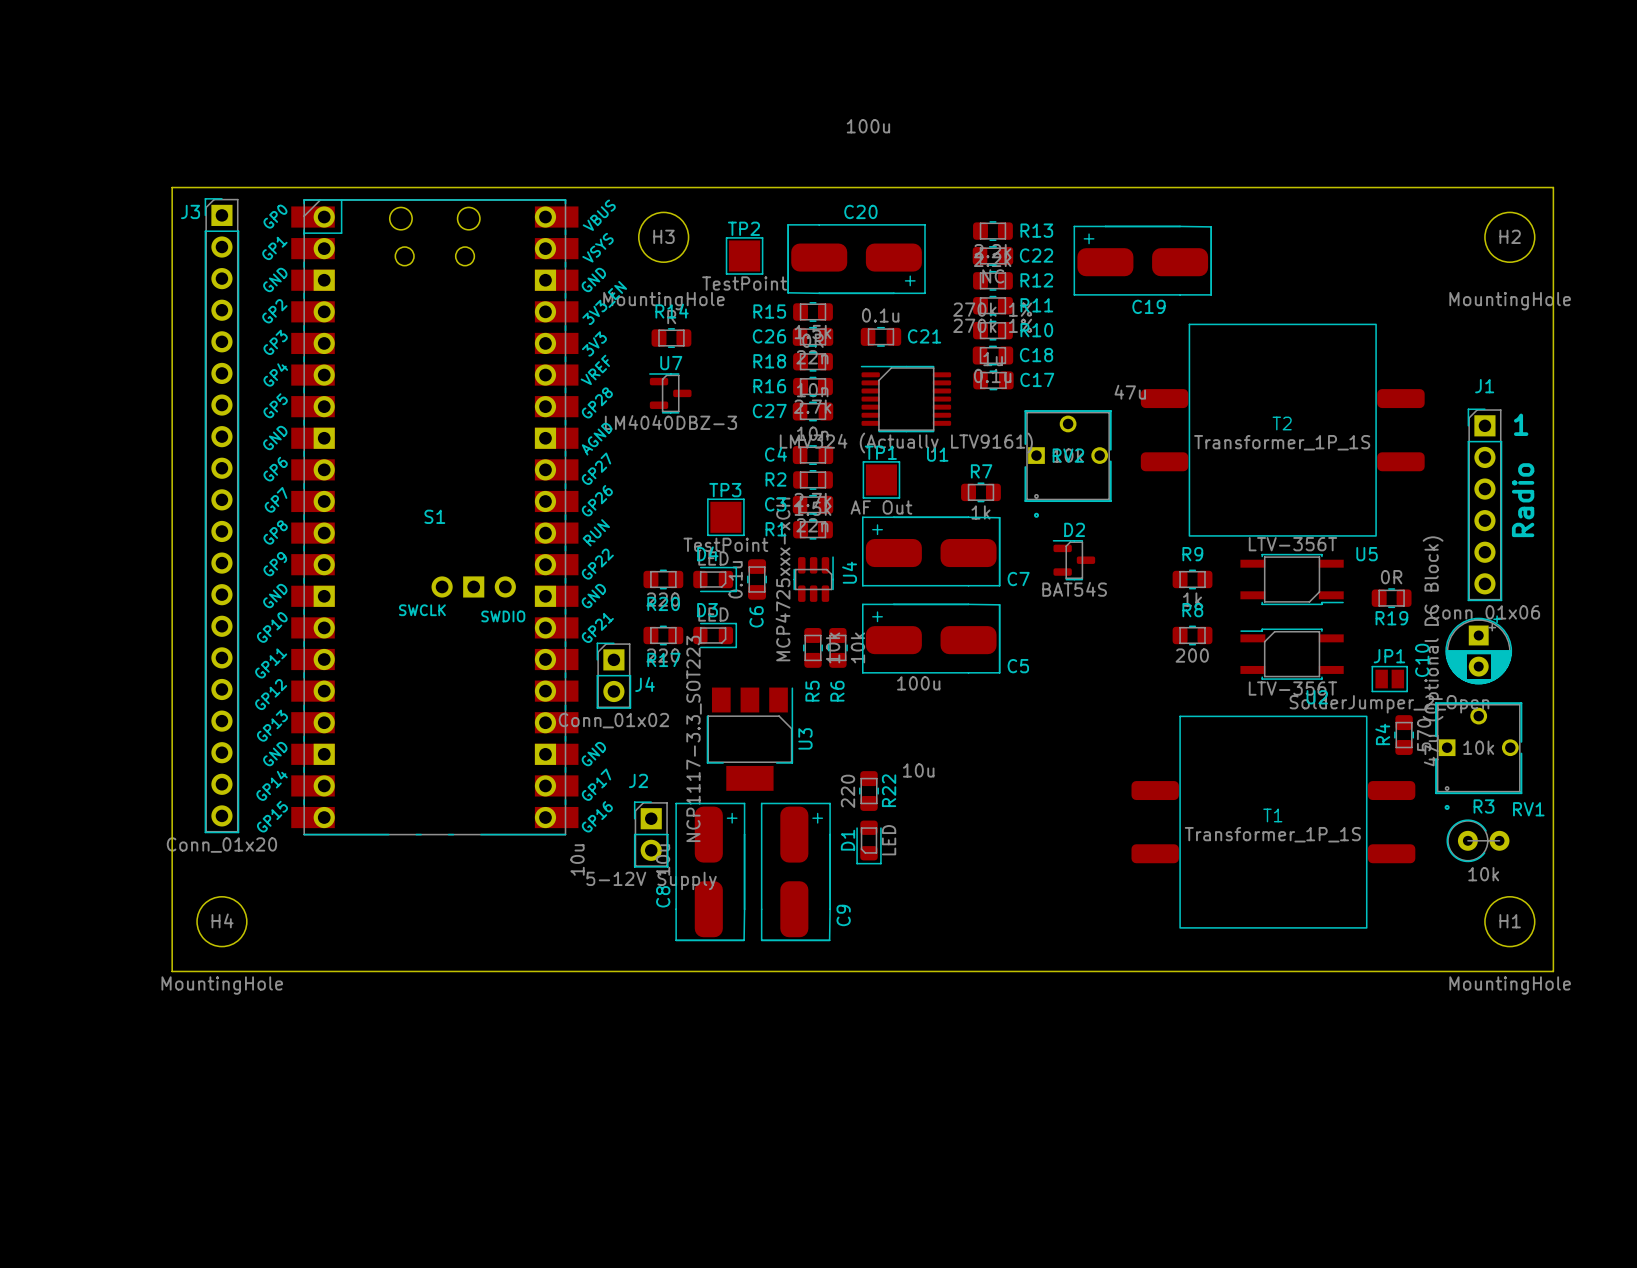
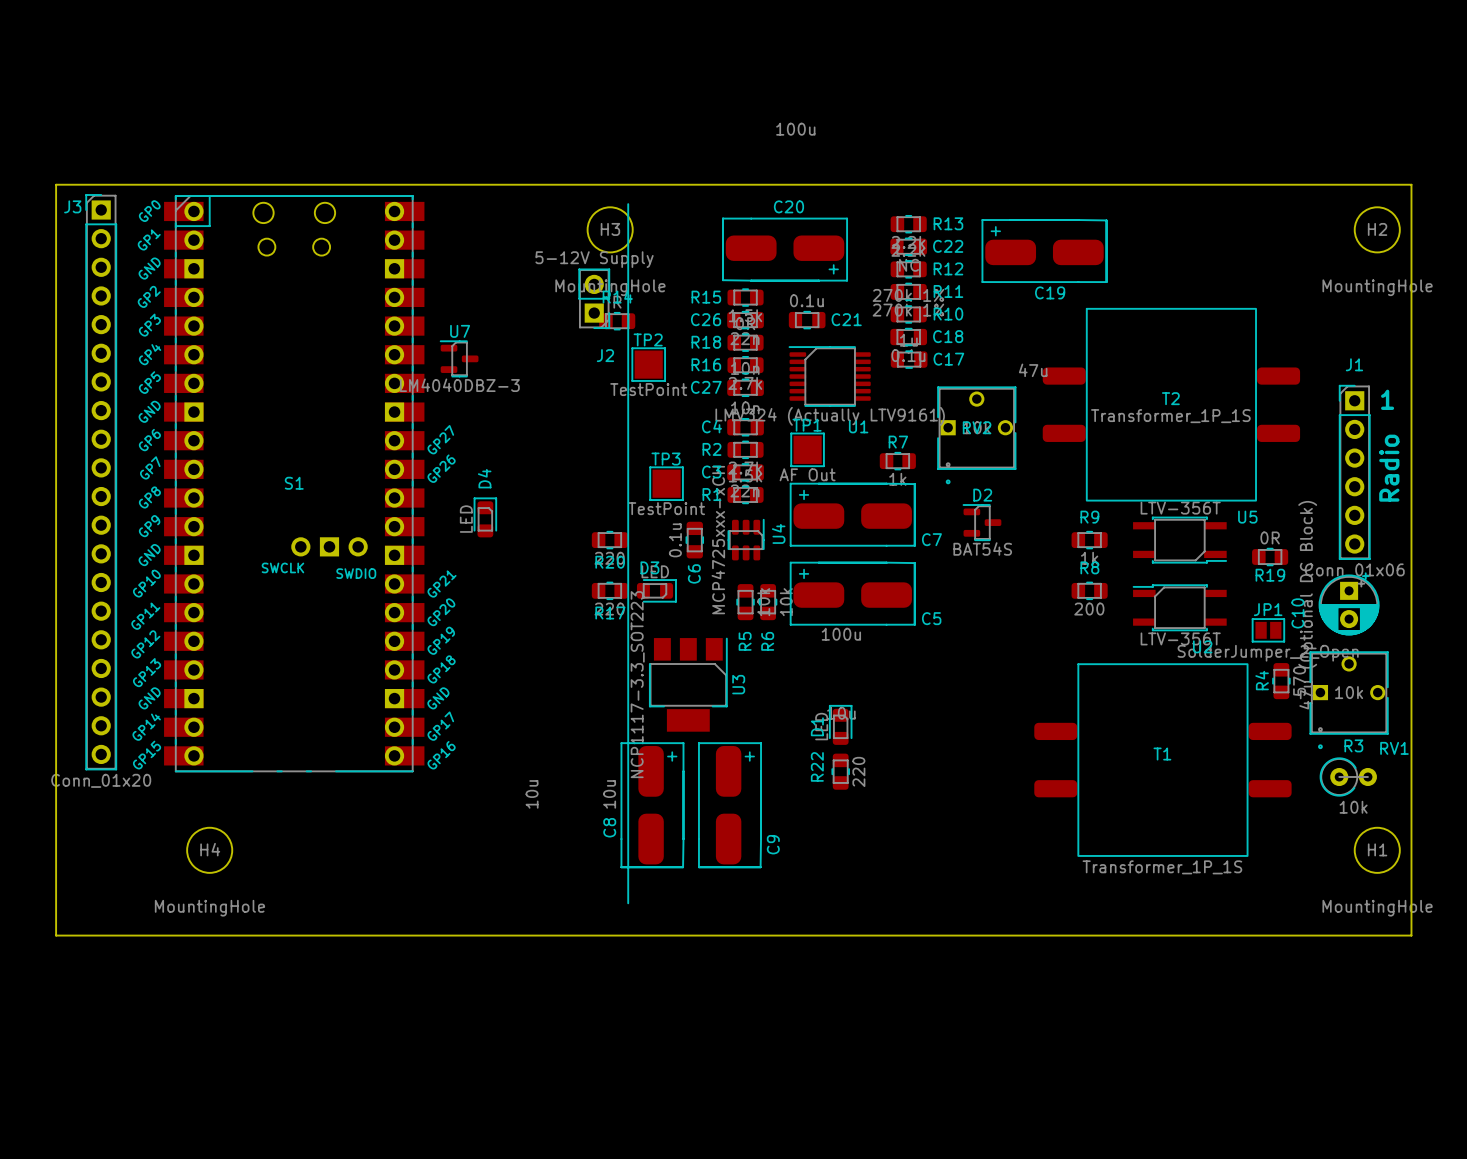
board edge: (172, 187) (172, 971) (1553, 971) (1553, 187) (1547, 187) -> (164, 184) (56, 184) (56, 935) (1411, 935) (1411, 184)
S1 footprint: [291, 199, 579, 836] -> [164, 195, 425, 773]
line: none -> (628, 204) (628, 903)
TP2 position: (744, 255) -> (648, 364)
U7 position: (670, 393) -> (459, 358)
J3 position: (221, 515) -> (101, 482)
D4 rotation: 0° (715, 579) -> 90° counterclockwise (485, 517)
D4 position: (715, 579) -> (485, 517)
J4: Conn_01x02 (613, 675) -> none
R22 name position: R22 (889, 790) -> R22 (817, 766)
R22 value position: 220 (848, 791) -> 220 (858, 771)
R22 position: (869, 791) -> (840, 771)
J2 rotation: 0° (651, 834) -> 180° (594, 298)
J2 position: (651, 834) -> (594, 298)
T1 value position: Transformer_1P_1S (1272, 834) -> Transformer_1P_1S (1162, 867)
D1 rotation: 0° (869, 842) -> 180° (840, 725)
D1 position: (869, 842) -> (840, 725)

